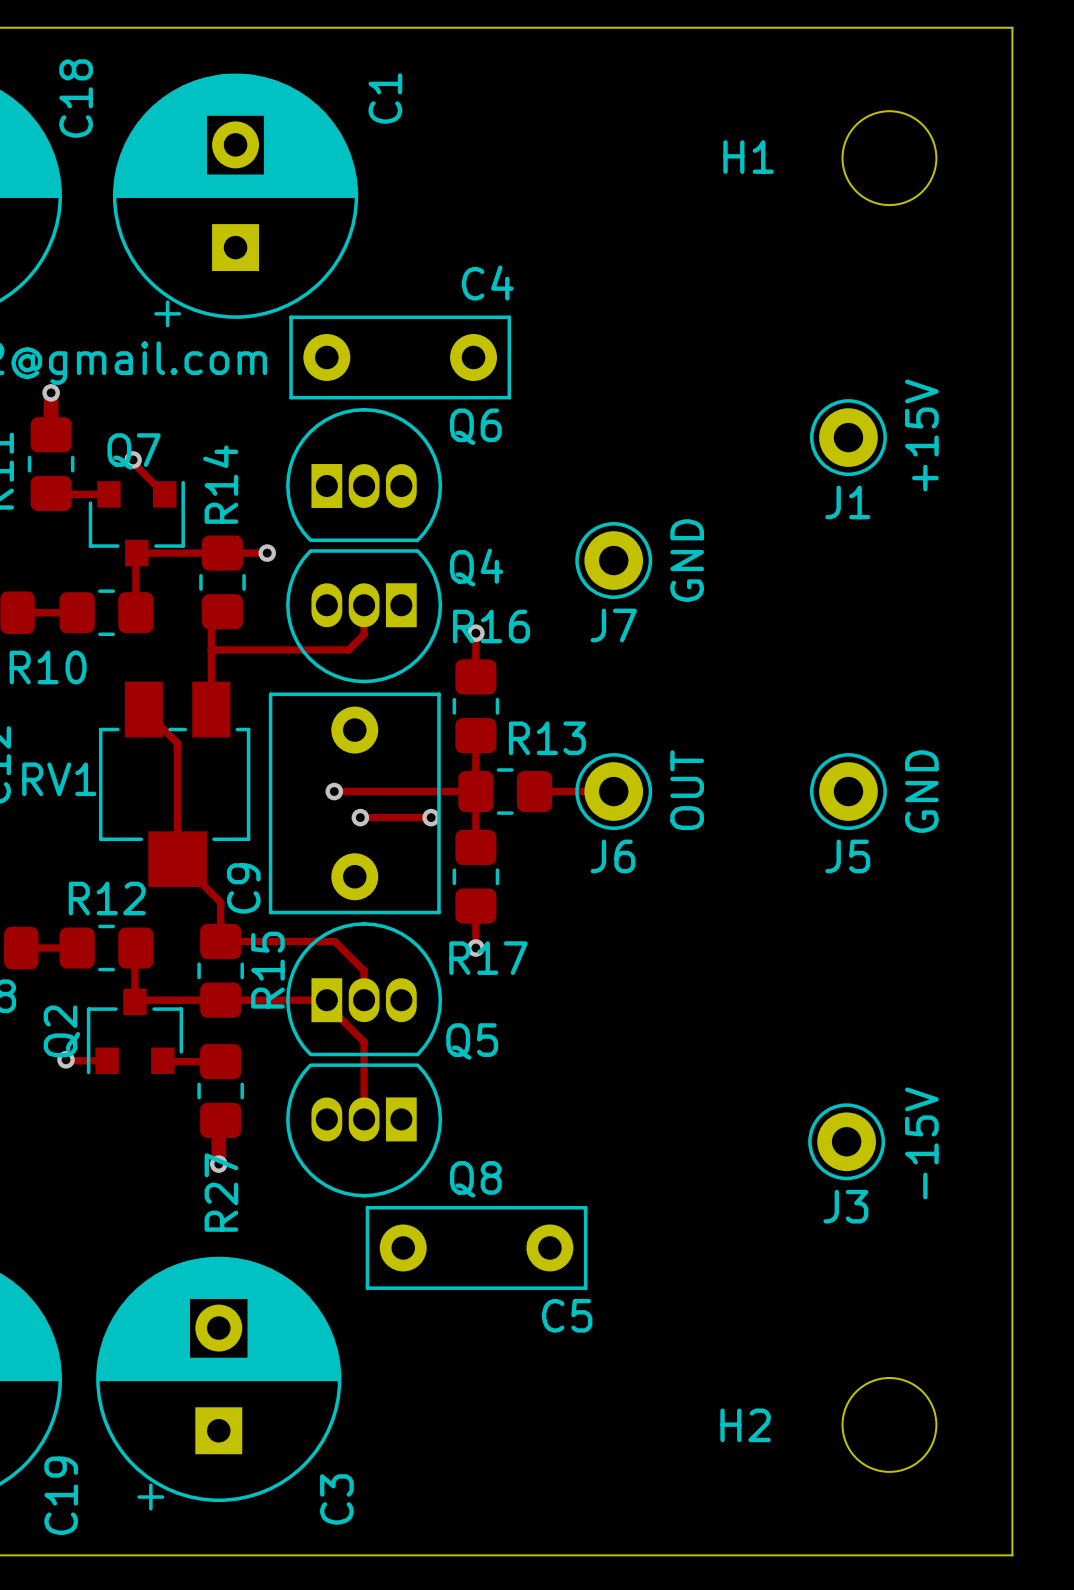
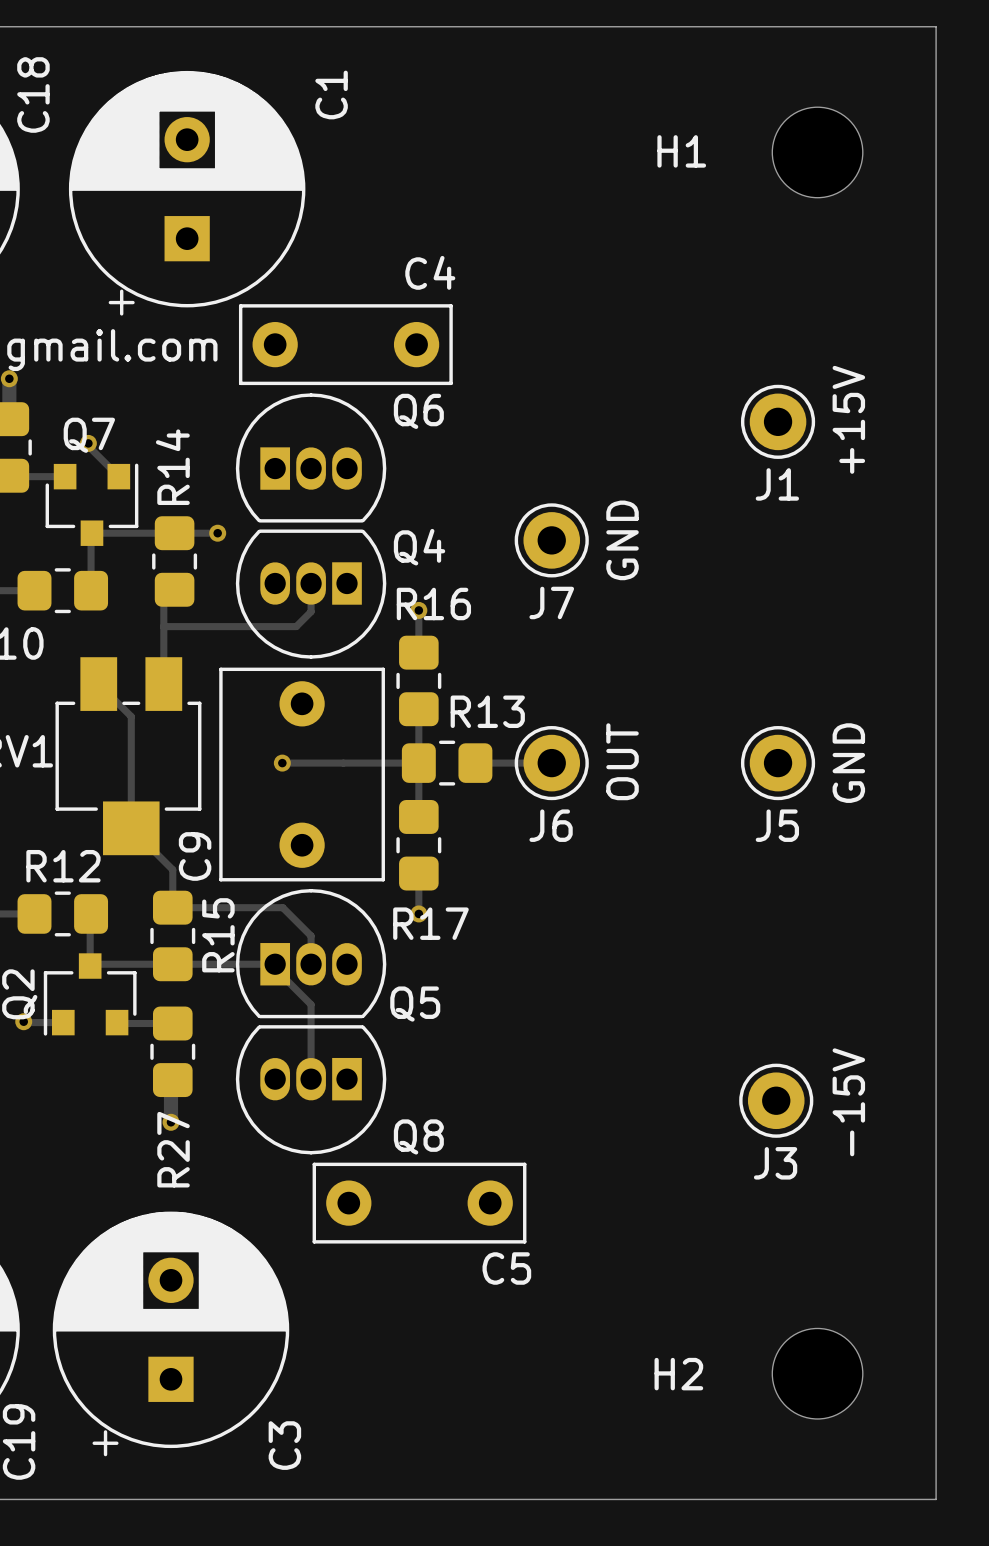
track: (360, 817) (431, 817) -> none
via: (360, 817) -> none
via: (431, 817) -> none

